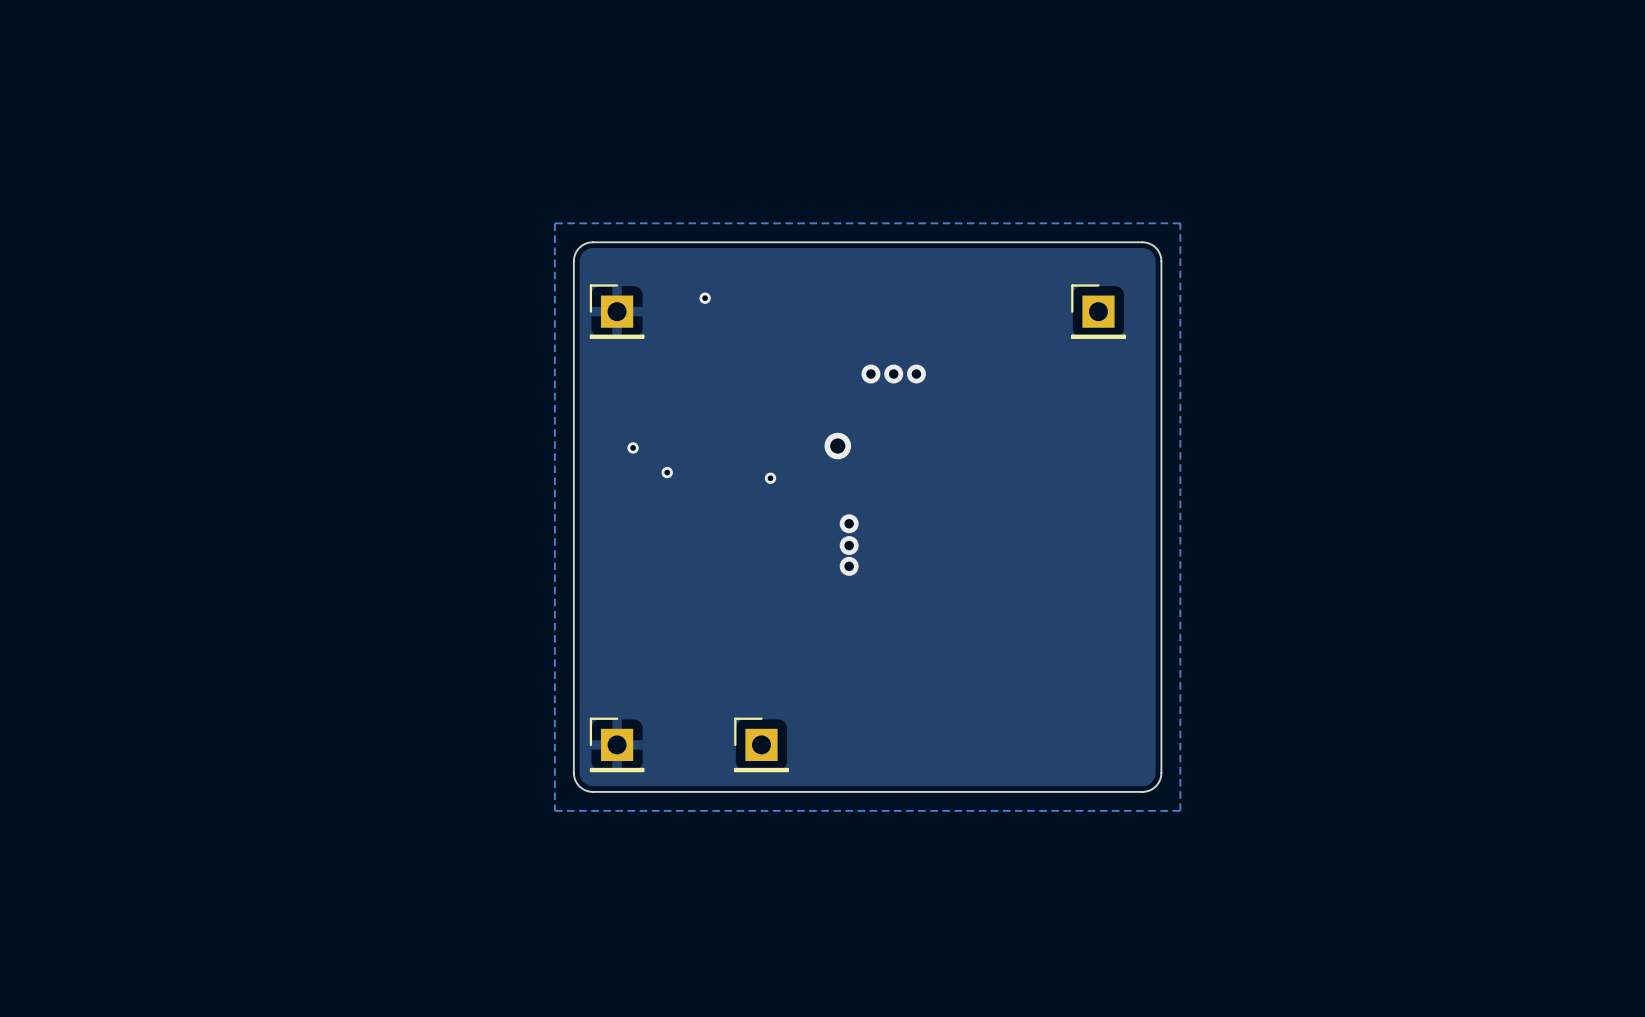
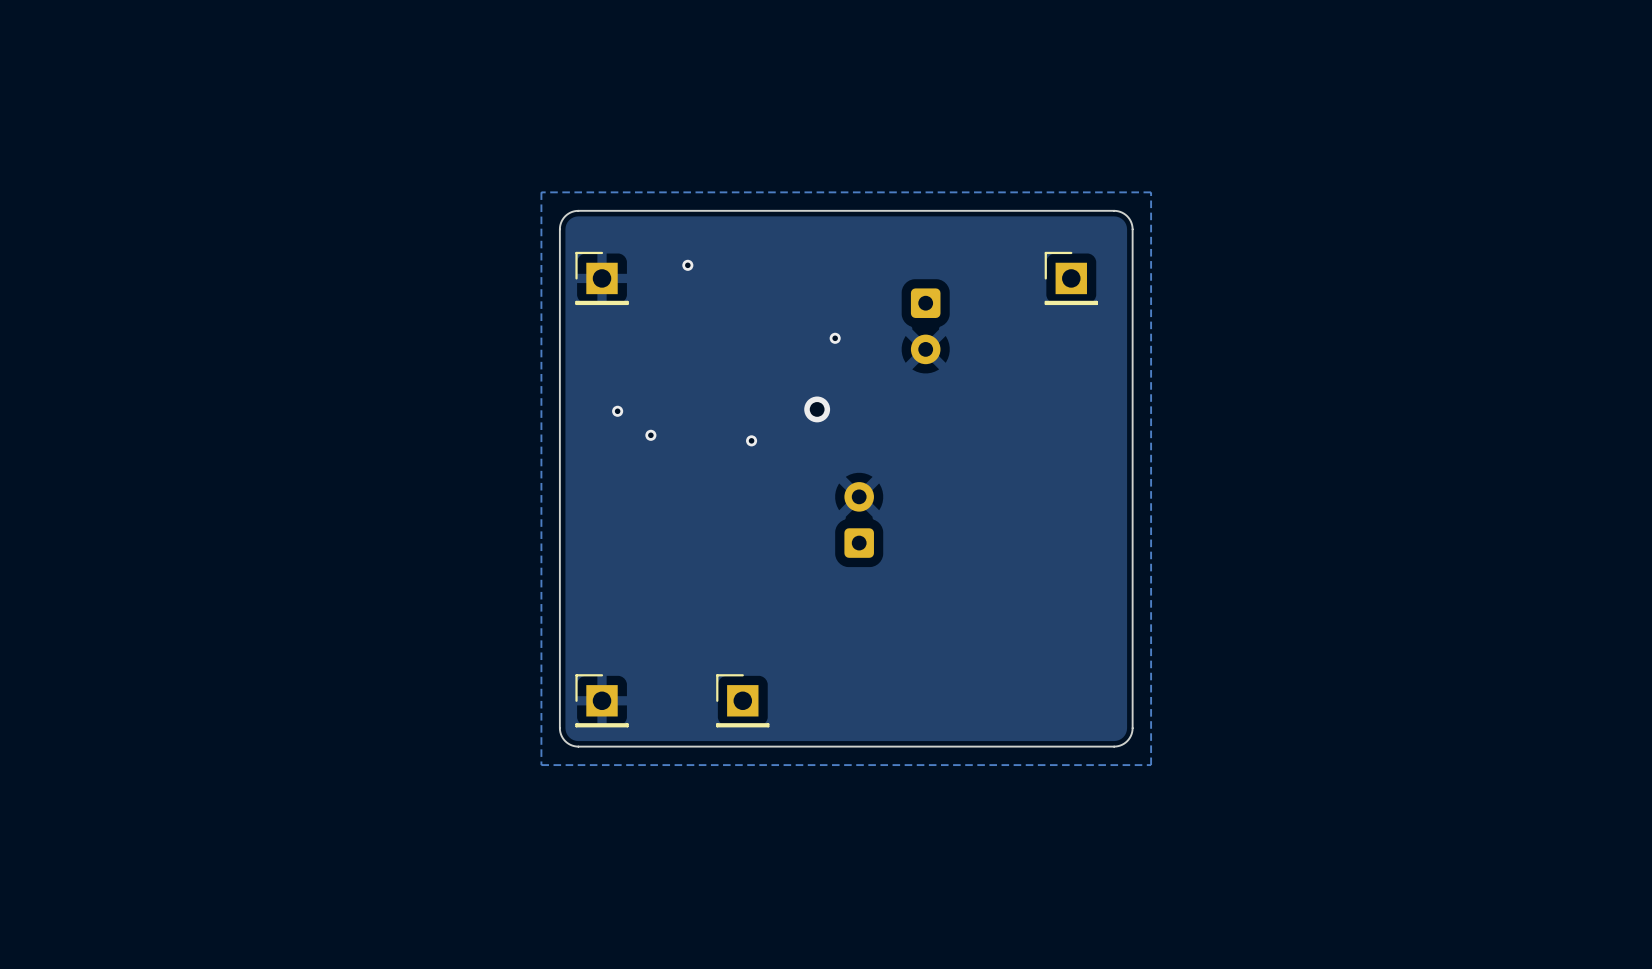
part: none -> (925, 326)
via size: [861, 364, 881, 384] -> [829, 332, 841, 344]
via: (893, 374) -> none
via: (916, 374) -> none
via: (849, 523) -> none
via: (849, 545) -> none
part: none -> (859, 519)
via: (849, 566) -> none

